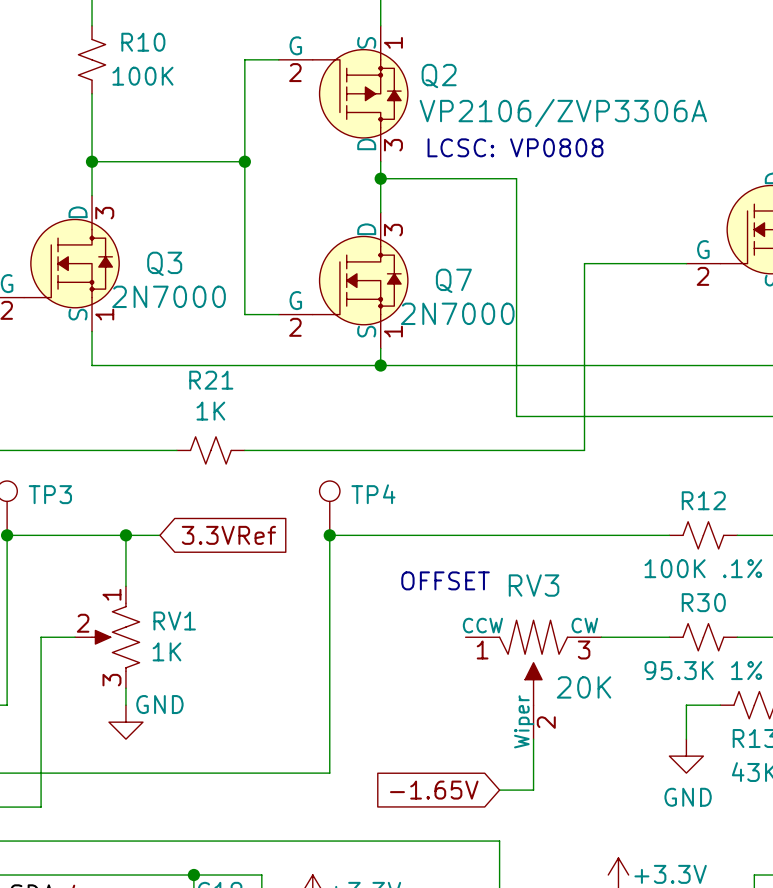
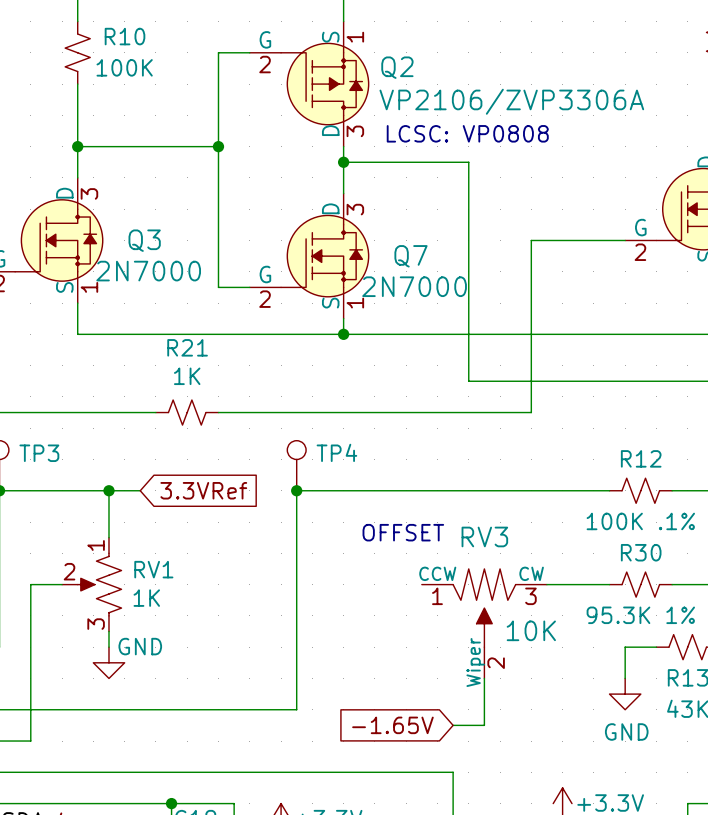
RV3 value: 20K (584, 687) -> 10K (531, 630)

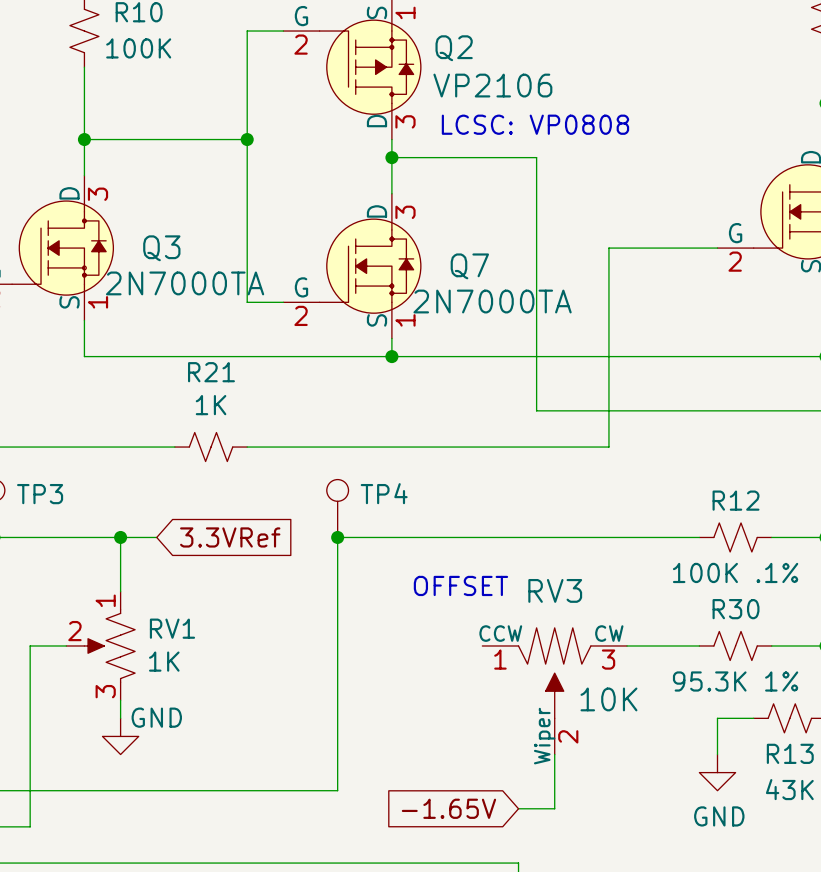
Q2 value: VP2106/ZVP3306A (511, 101) -> VP2106 (492, 85)
Q3 value: 2N7000 (148, 271) -> 2N7000TA (185, 283)
Q7 value: 2N7000 (414, 286) -> 2N7000TA (492, 301)

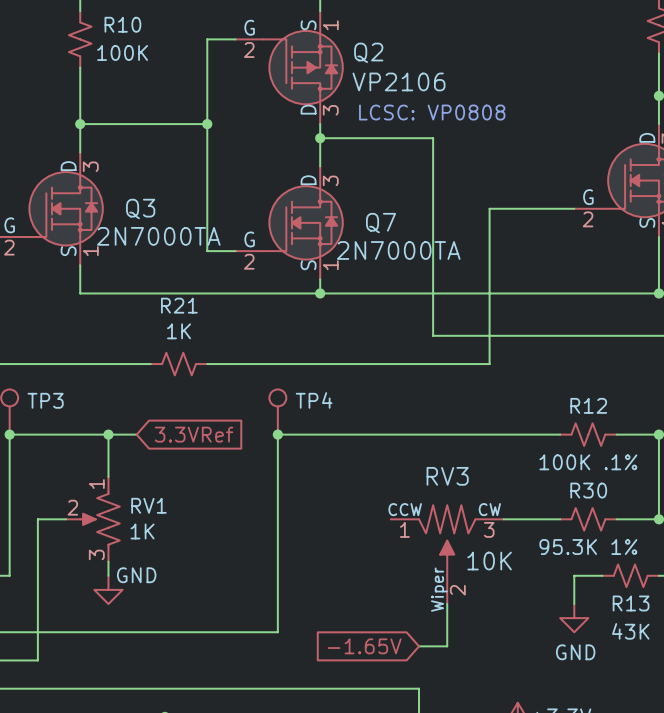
text: OFFSET (460, 585) -> none

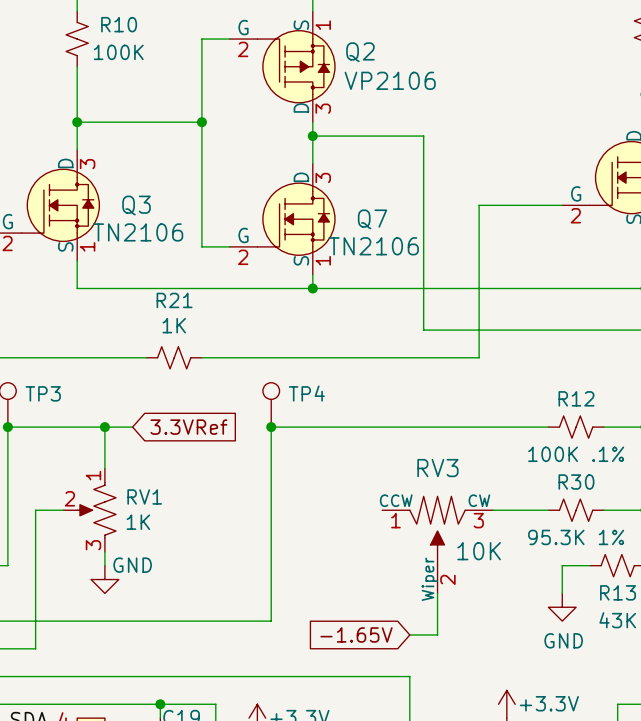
text: LCSC: VP0808 (432, 112) -> none
Q3 value: 2N7000TA (158, 236) -> TN2106 (138, 232)
Q7 value: 2N7000TA (398, 250) -> TN2106 (373, 246)

